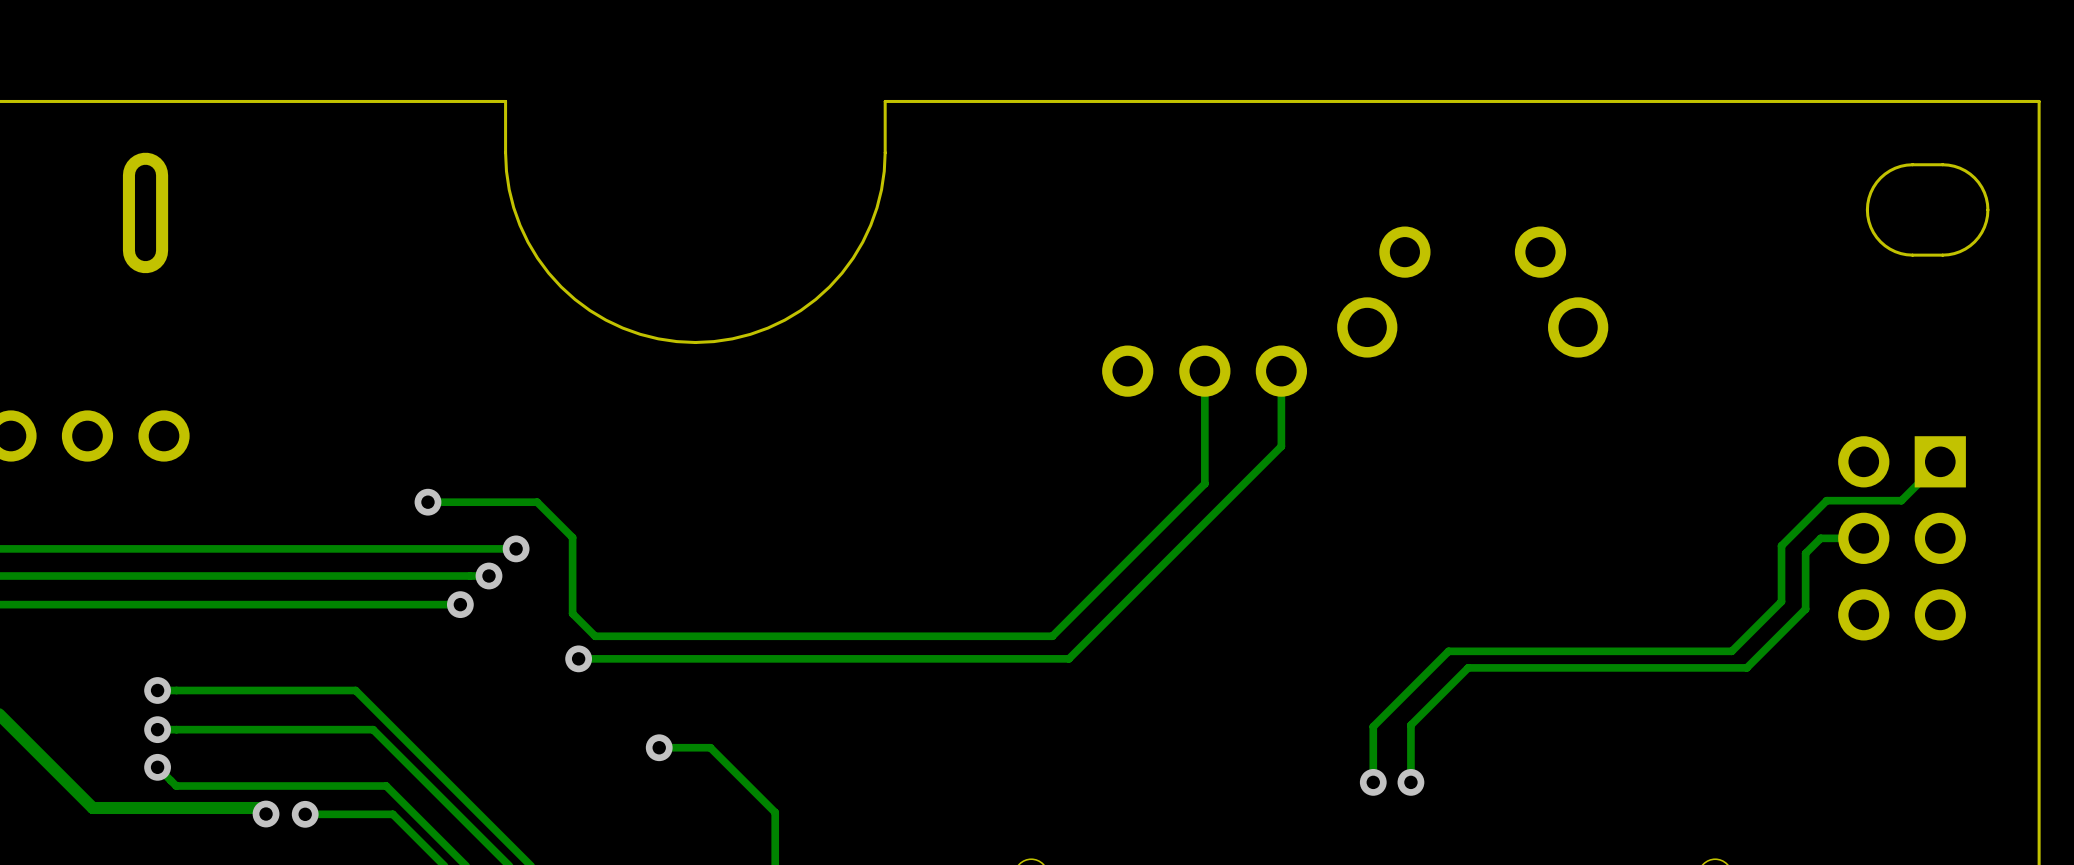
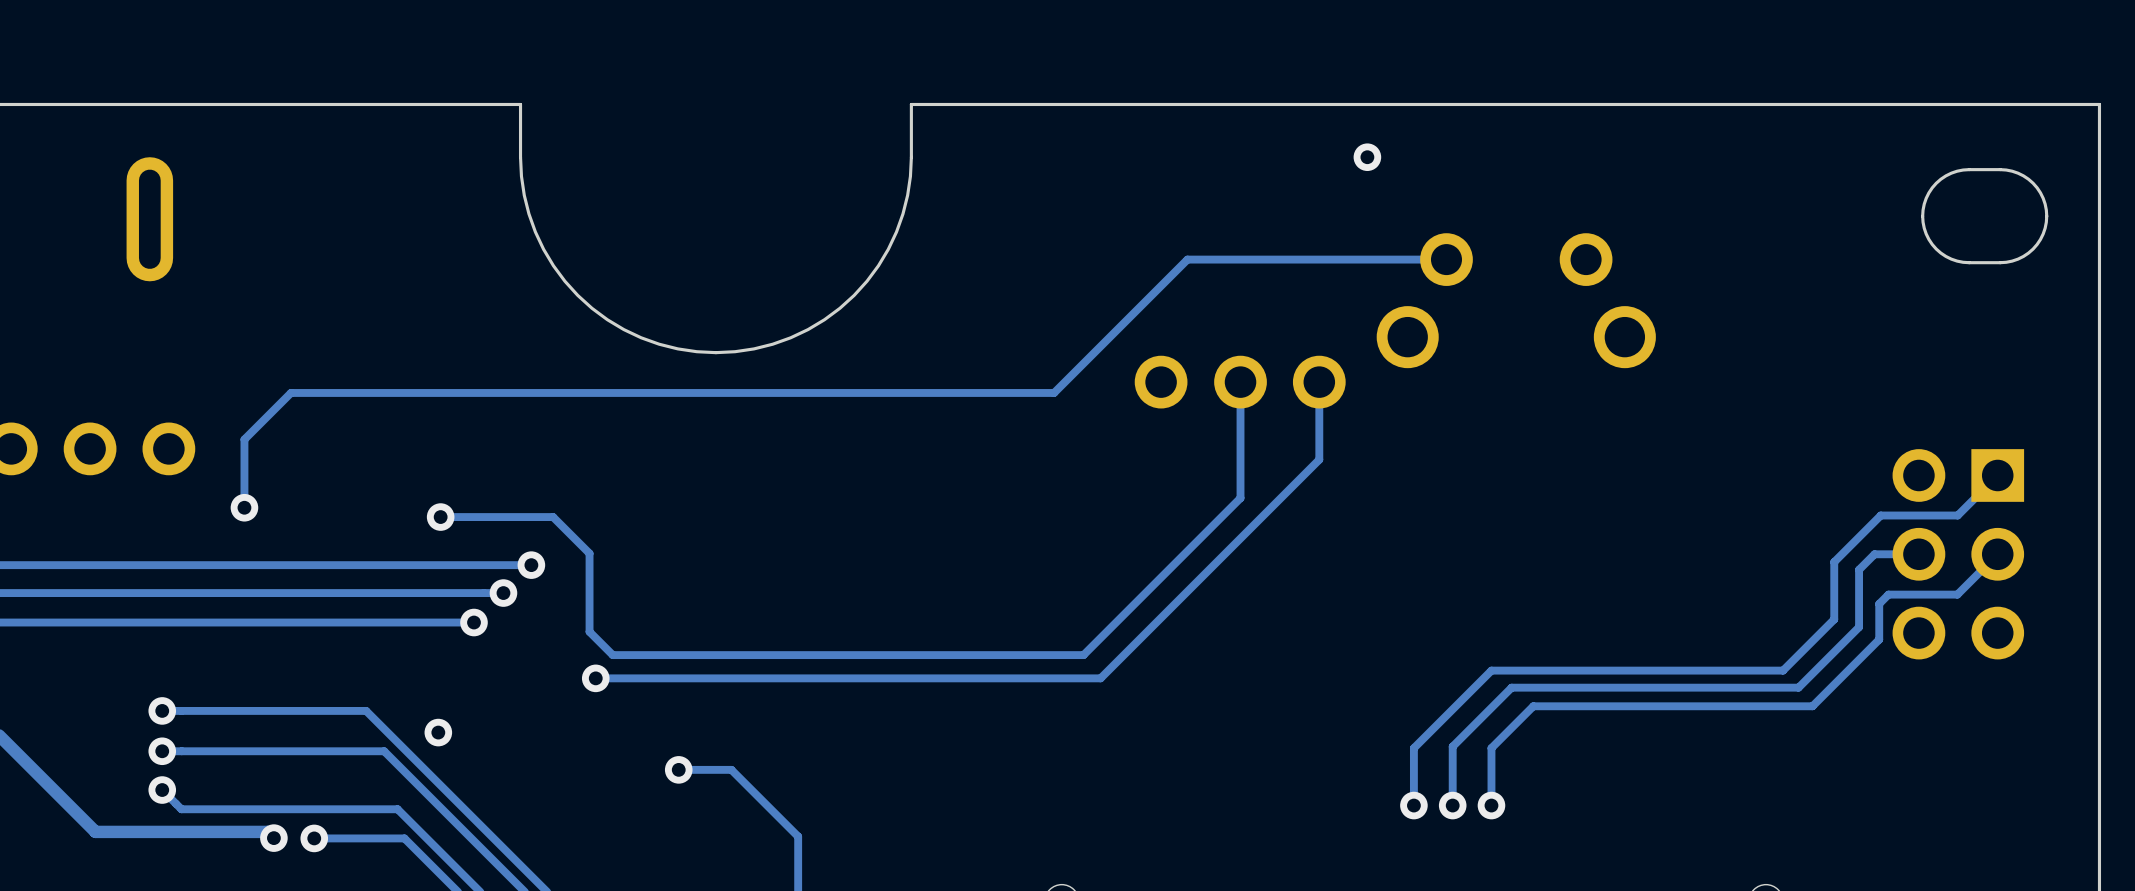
via: none -> (1367, 157)
track: none -> (1446, 259) (1187, 259) (1054, 392) (290, 392) (244, 439) (244, 507)
via: none -> (244, 507)
track: none -> (1997, 554) (1957, 594) (1888, 594) (1879, 603) (1879, 639) (1812, 706) (1533, 706) (1491, 748) (1491, 805)
via: none -> (438, 732)
via: none -> (1491, 805)

